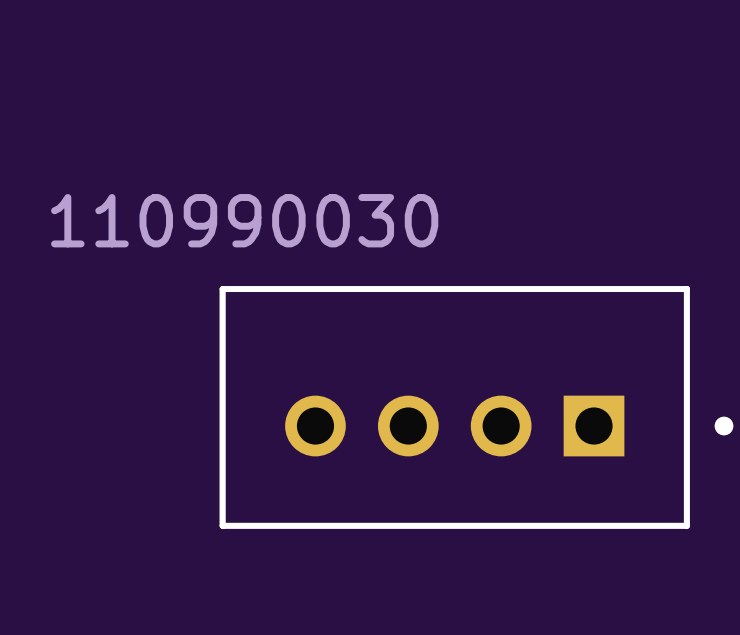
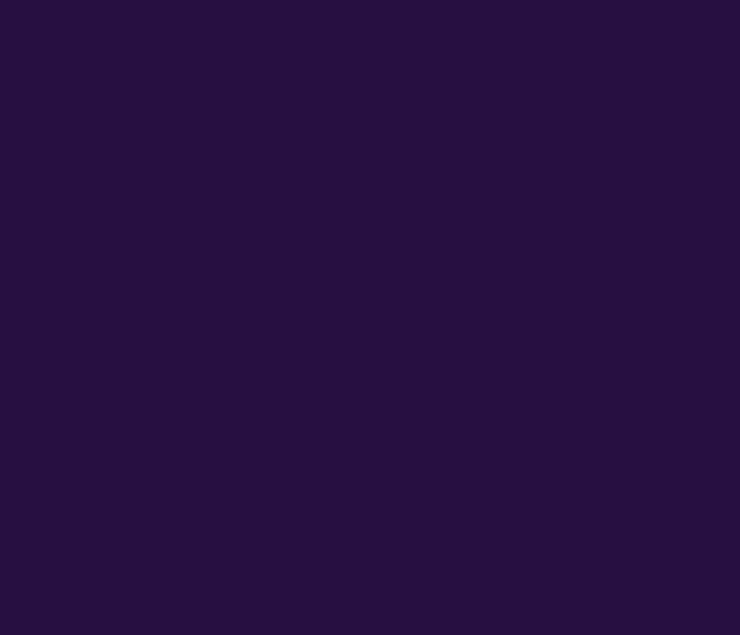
part: 110990030 (476, 407) -> none

